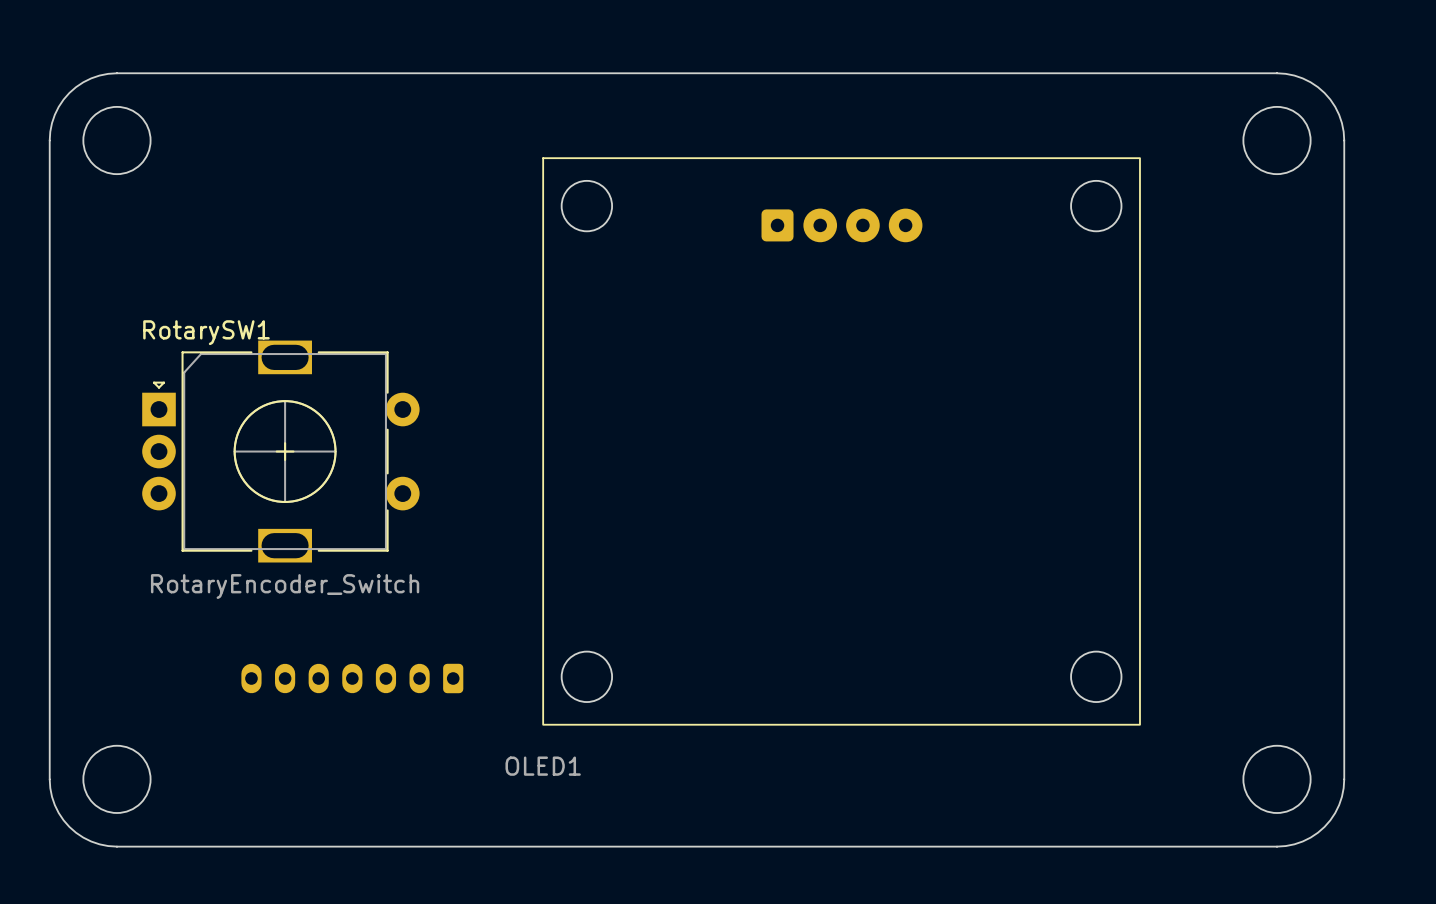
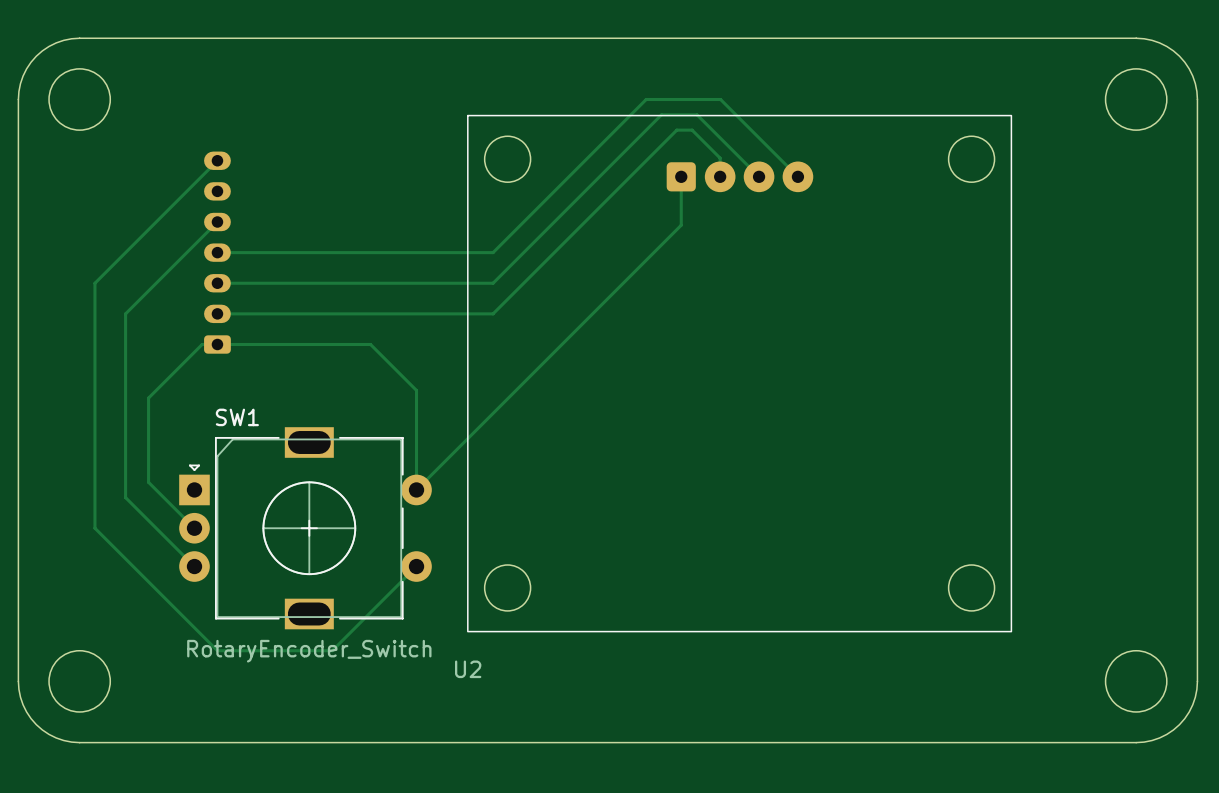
track: none -> (217, 160) (94, 283) (94, 528) (217, 650) (332, 650) (416, 566)
track: none -> (681, 176) (681, 225) (416, 489) (416, 390) (370, 344) (202, 344) (148, 398) (148, 482) (194, 528)
track: none -> (720, 176) (720, 158) (692, 130) (676, 130) (493, 313) (217, 313)
track: none -> (759, 176) (697, 114) (661, 114) (493, 283) (217, 283)
track: none -> (797, 176) (720, 99) (646, 99) (493, 252) (217, 252)
track: none -> (217, 222) (125, 313) (125, 497) (194, 566)
RotarySW1: RotaryEncoder_Switch (280, 451) -> none
SW1: none -> RotaryEncoder_Switch (305, 528)
part rotation: 0° (352, 678) -> 90° clockwise (217, 252)
part position: (352, 678) -> (217, 252)
OLED1 name: OLED1 (543, 766) -> U2 (468, 669)

